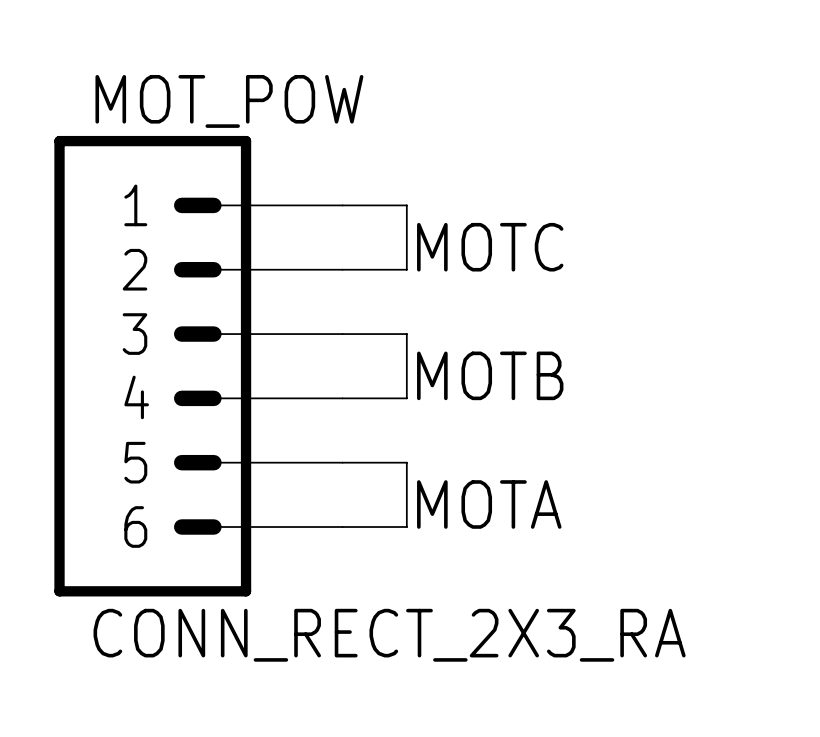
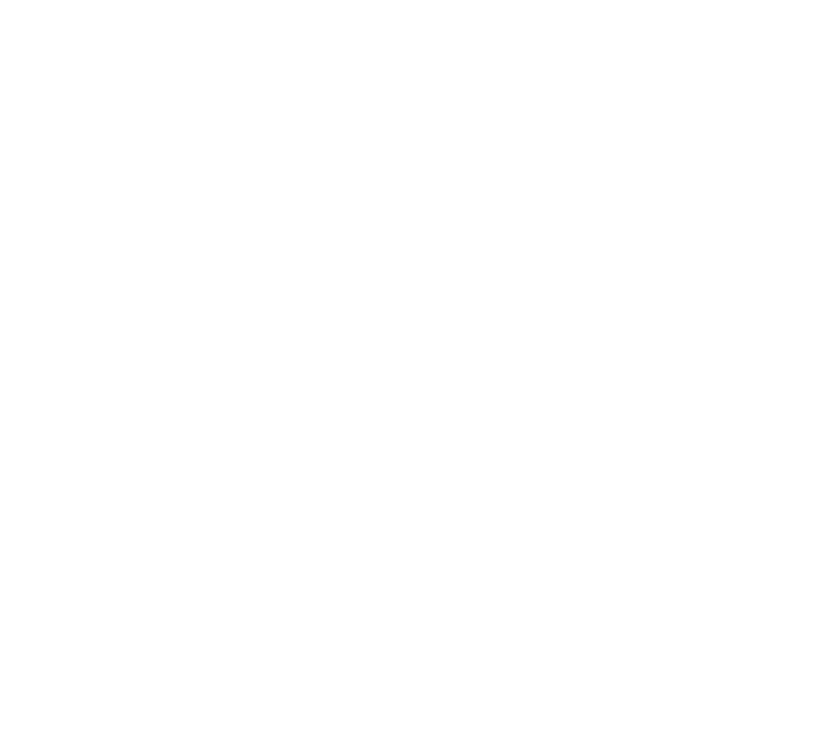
wire: (342, 205) (406, 205) (406, 269) (342, 269) -> none
label: MOTC (490, 247) -> none
wire: (342, 334) (406, 334) (406, 398) (342, 398) -> none
MOT_POW: CONN_RECT_2X3_RA (198, 366) -> none
label: MOTB (490, 375) -> none
wire: (342, 462) (406, 462) (406, 527) (342, 527) -> none
label: MOTA (489, 504) -> none

